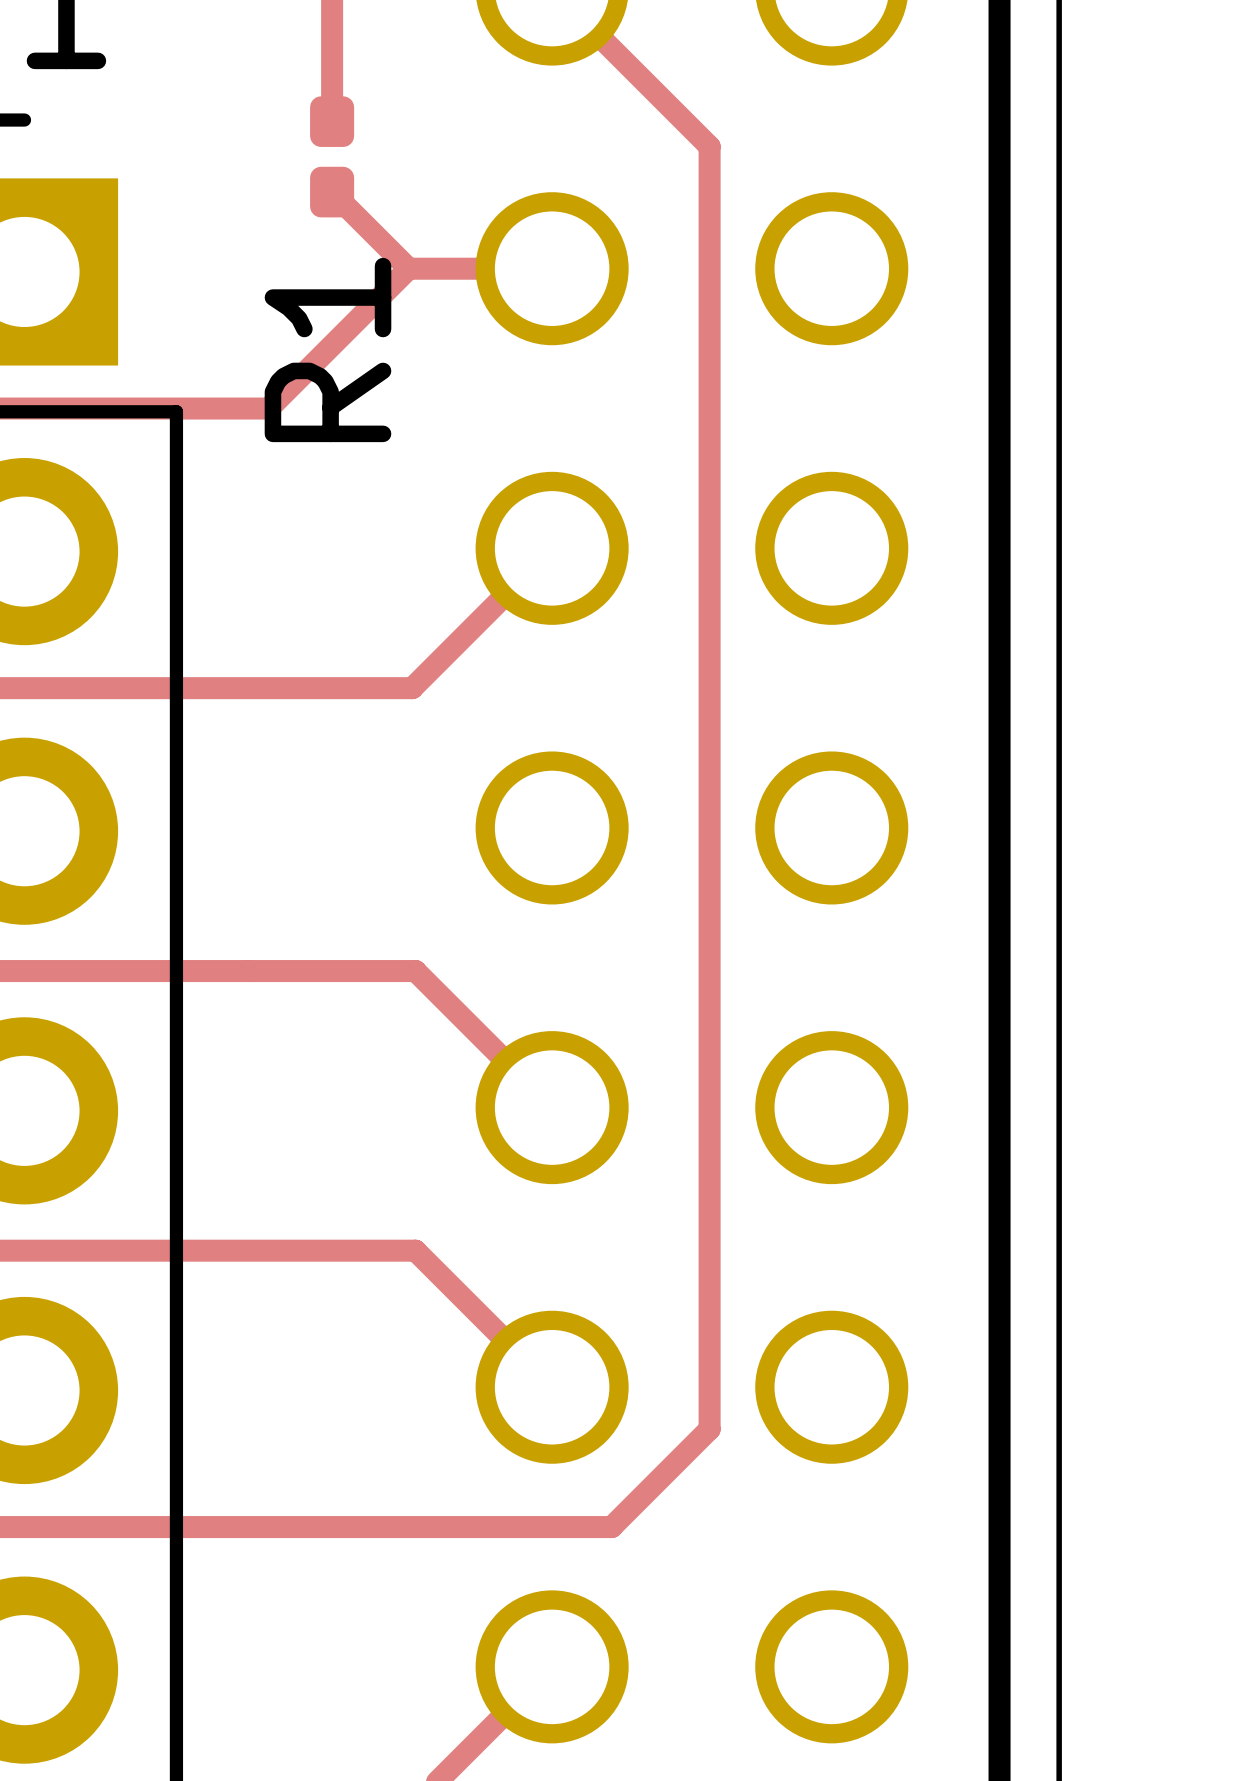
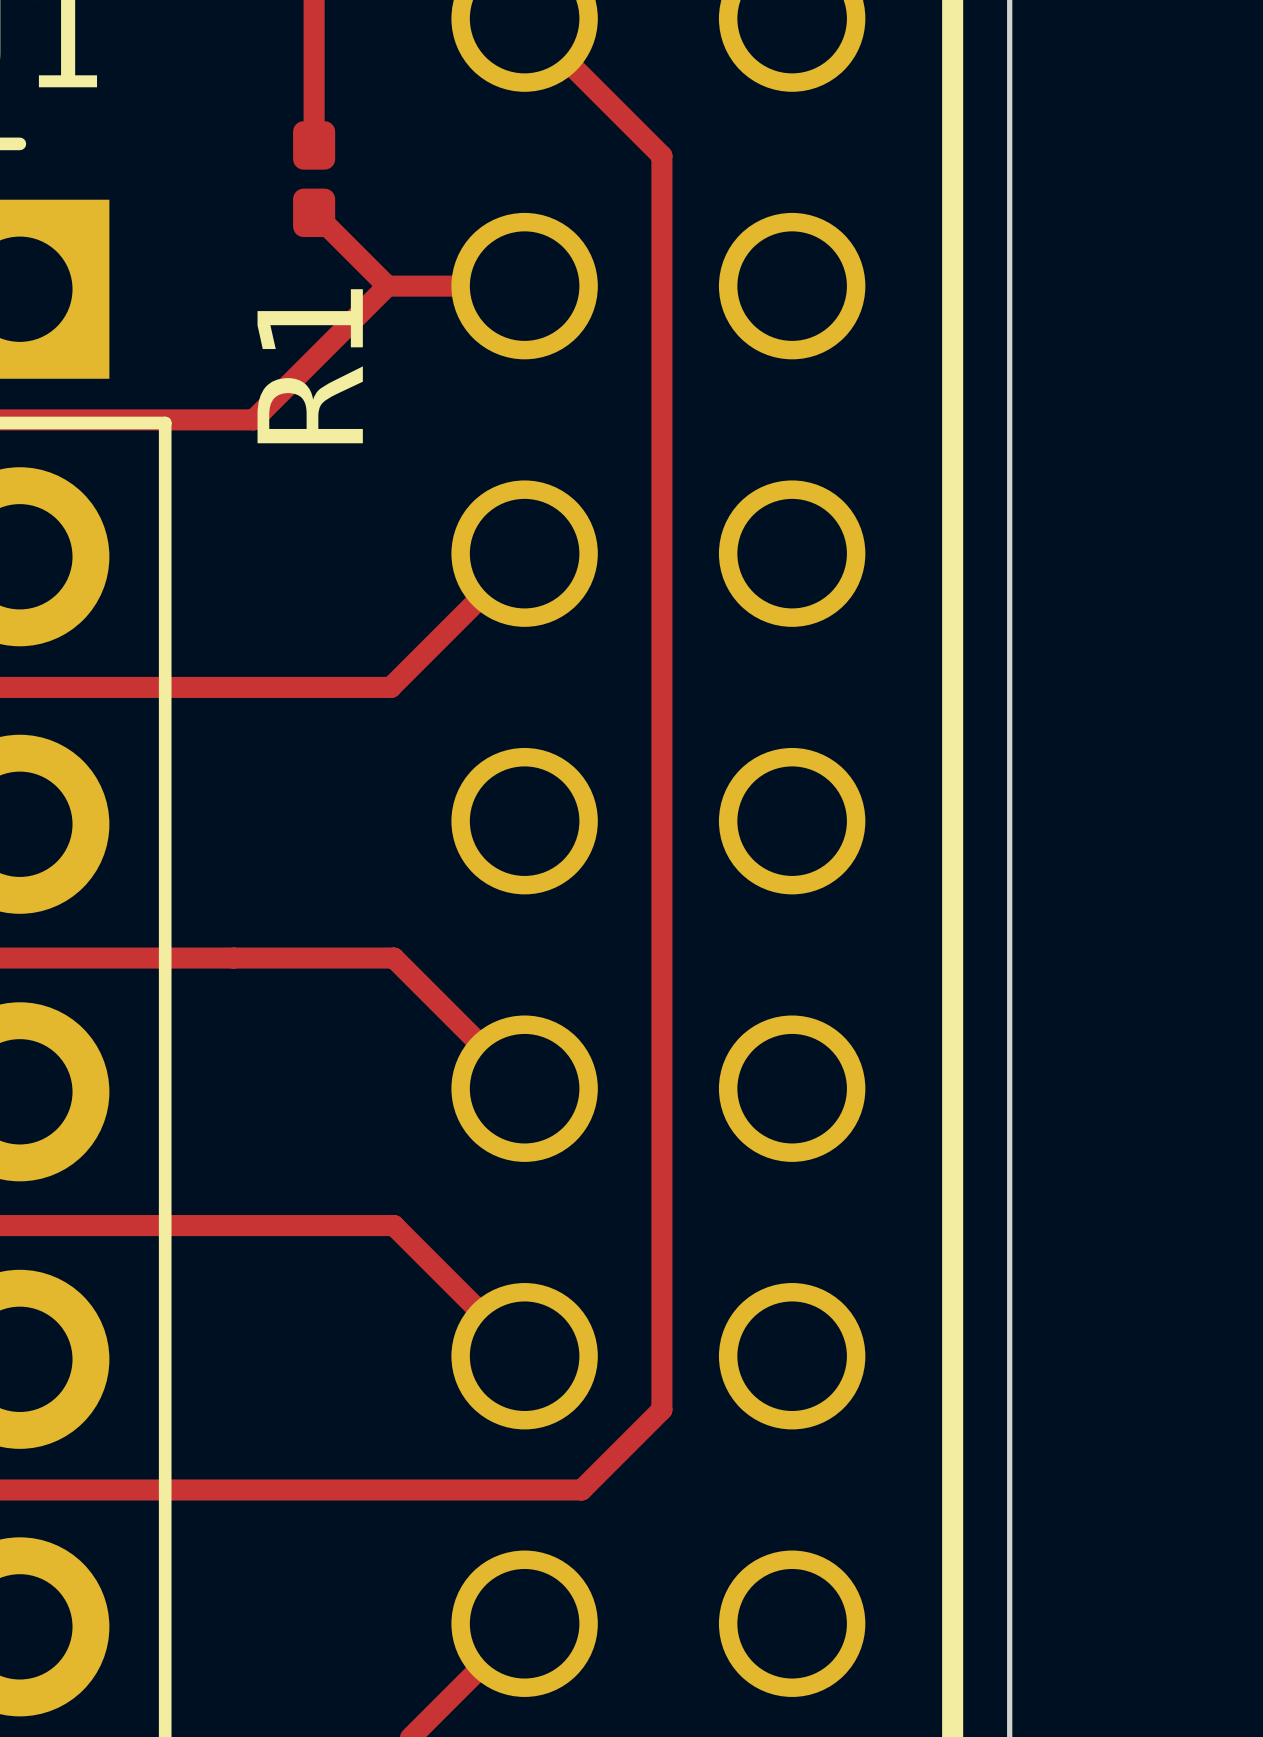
top track: (695, 132) (709, 146) (709, 1429) (695, 1443) -> (661, 155) (661, 1409)

